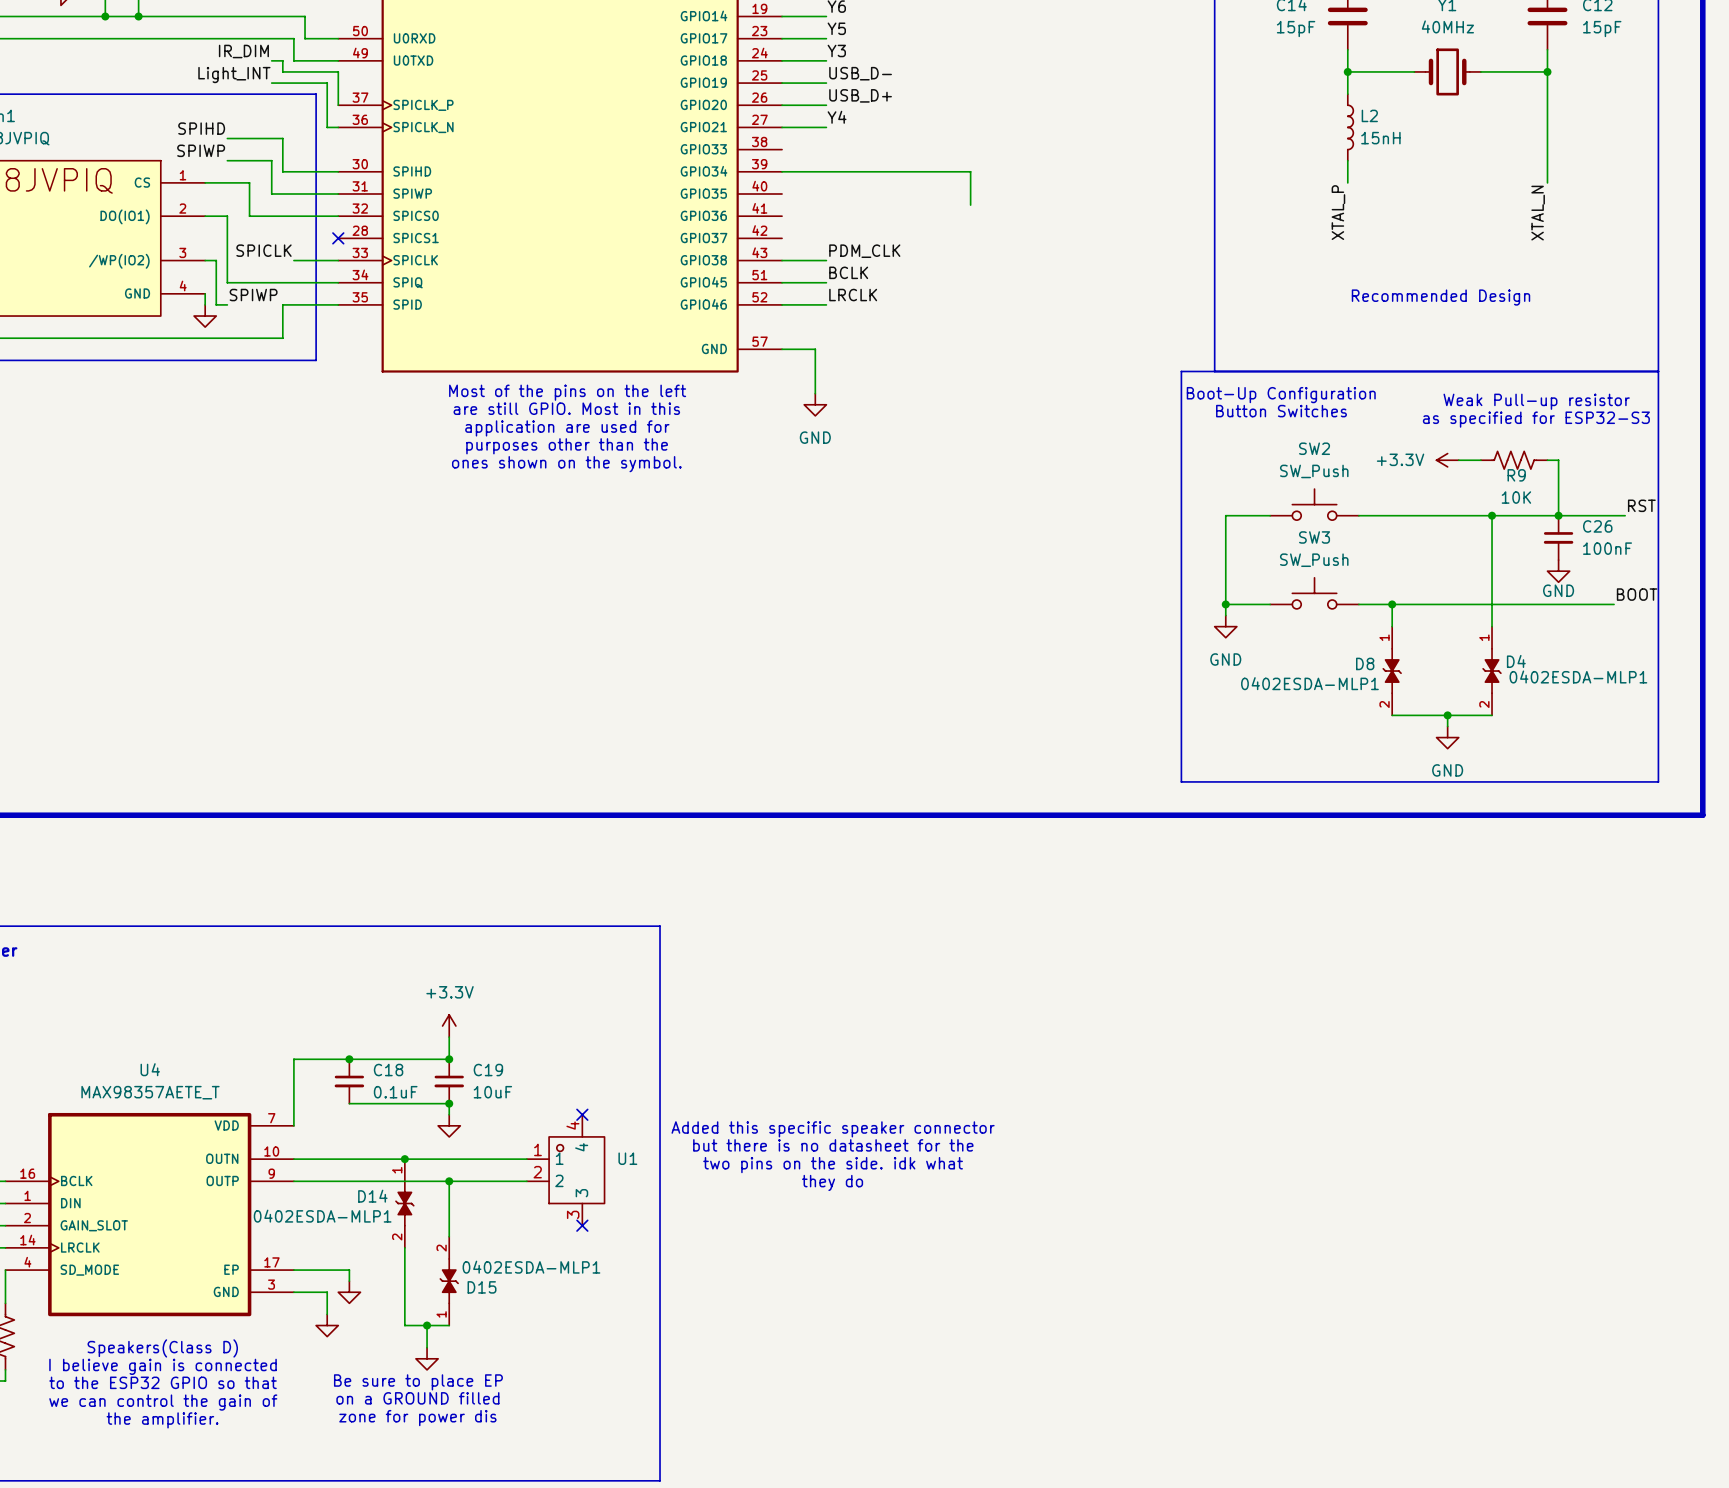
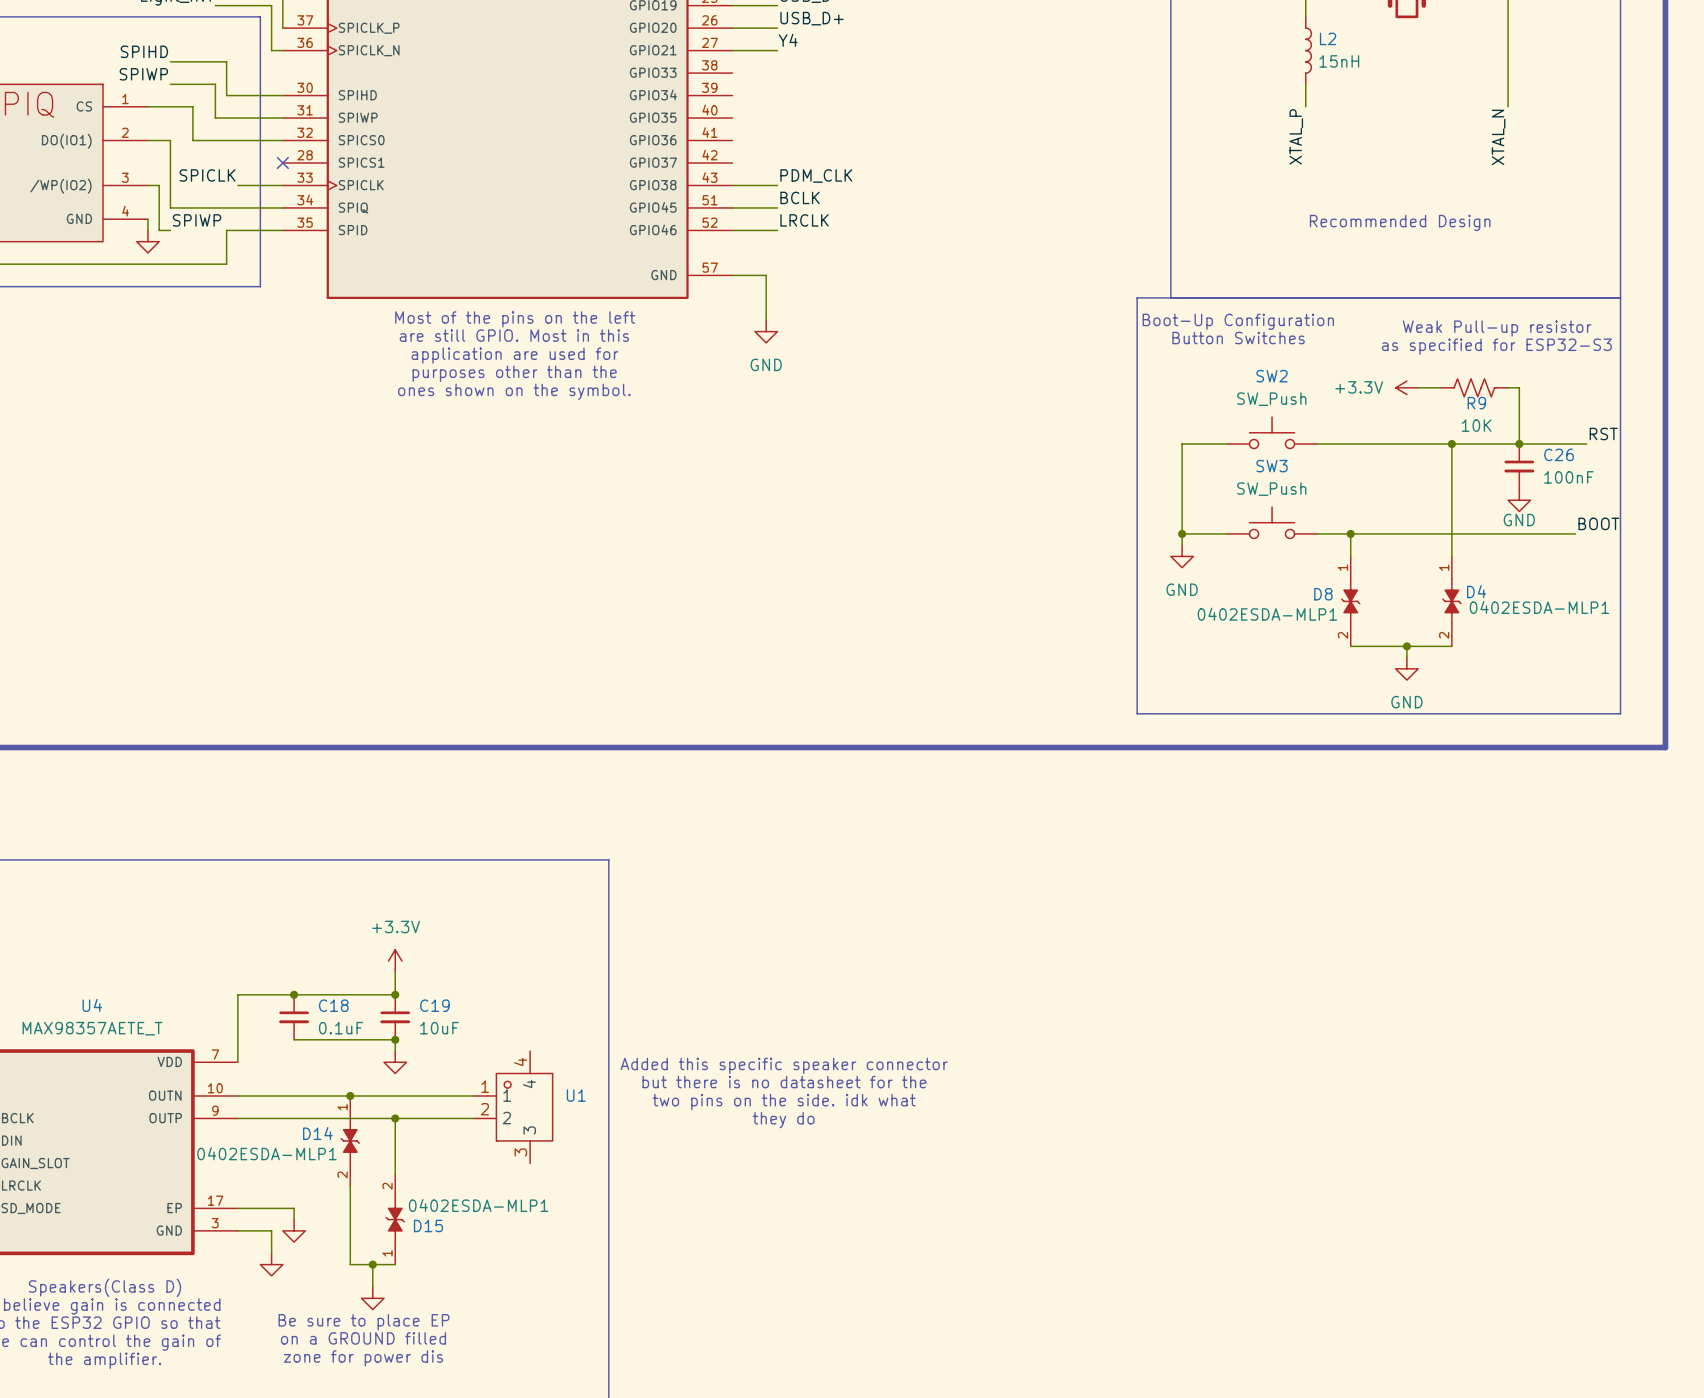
wire: (782, 171) (970, 171) (970, 205) -> none
no-connect mark: (582, 1114) -> none
no-connect mark: (582, 1225) -> none

